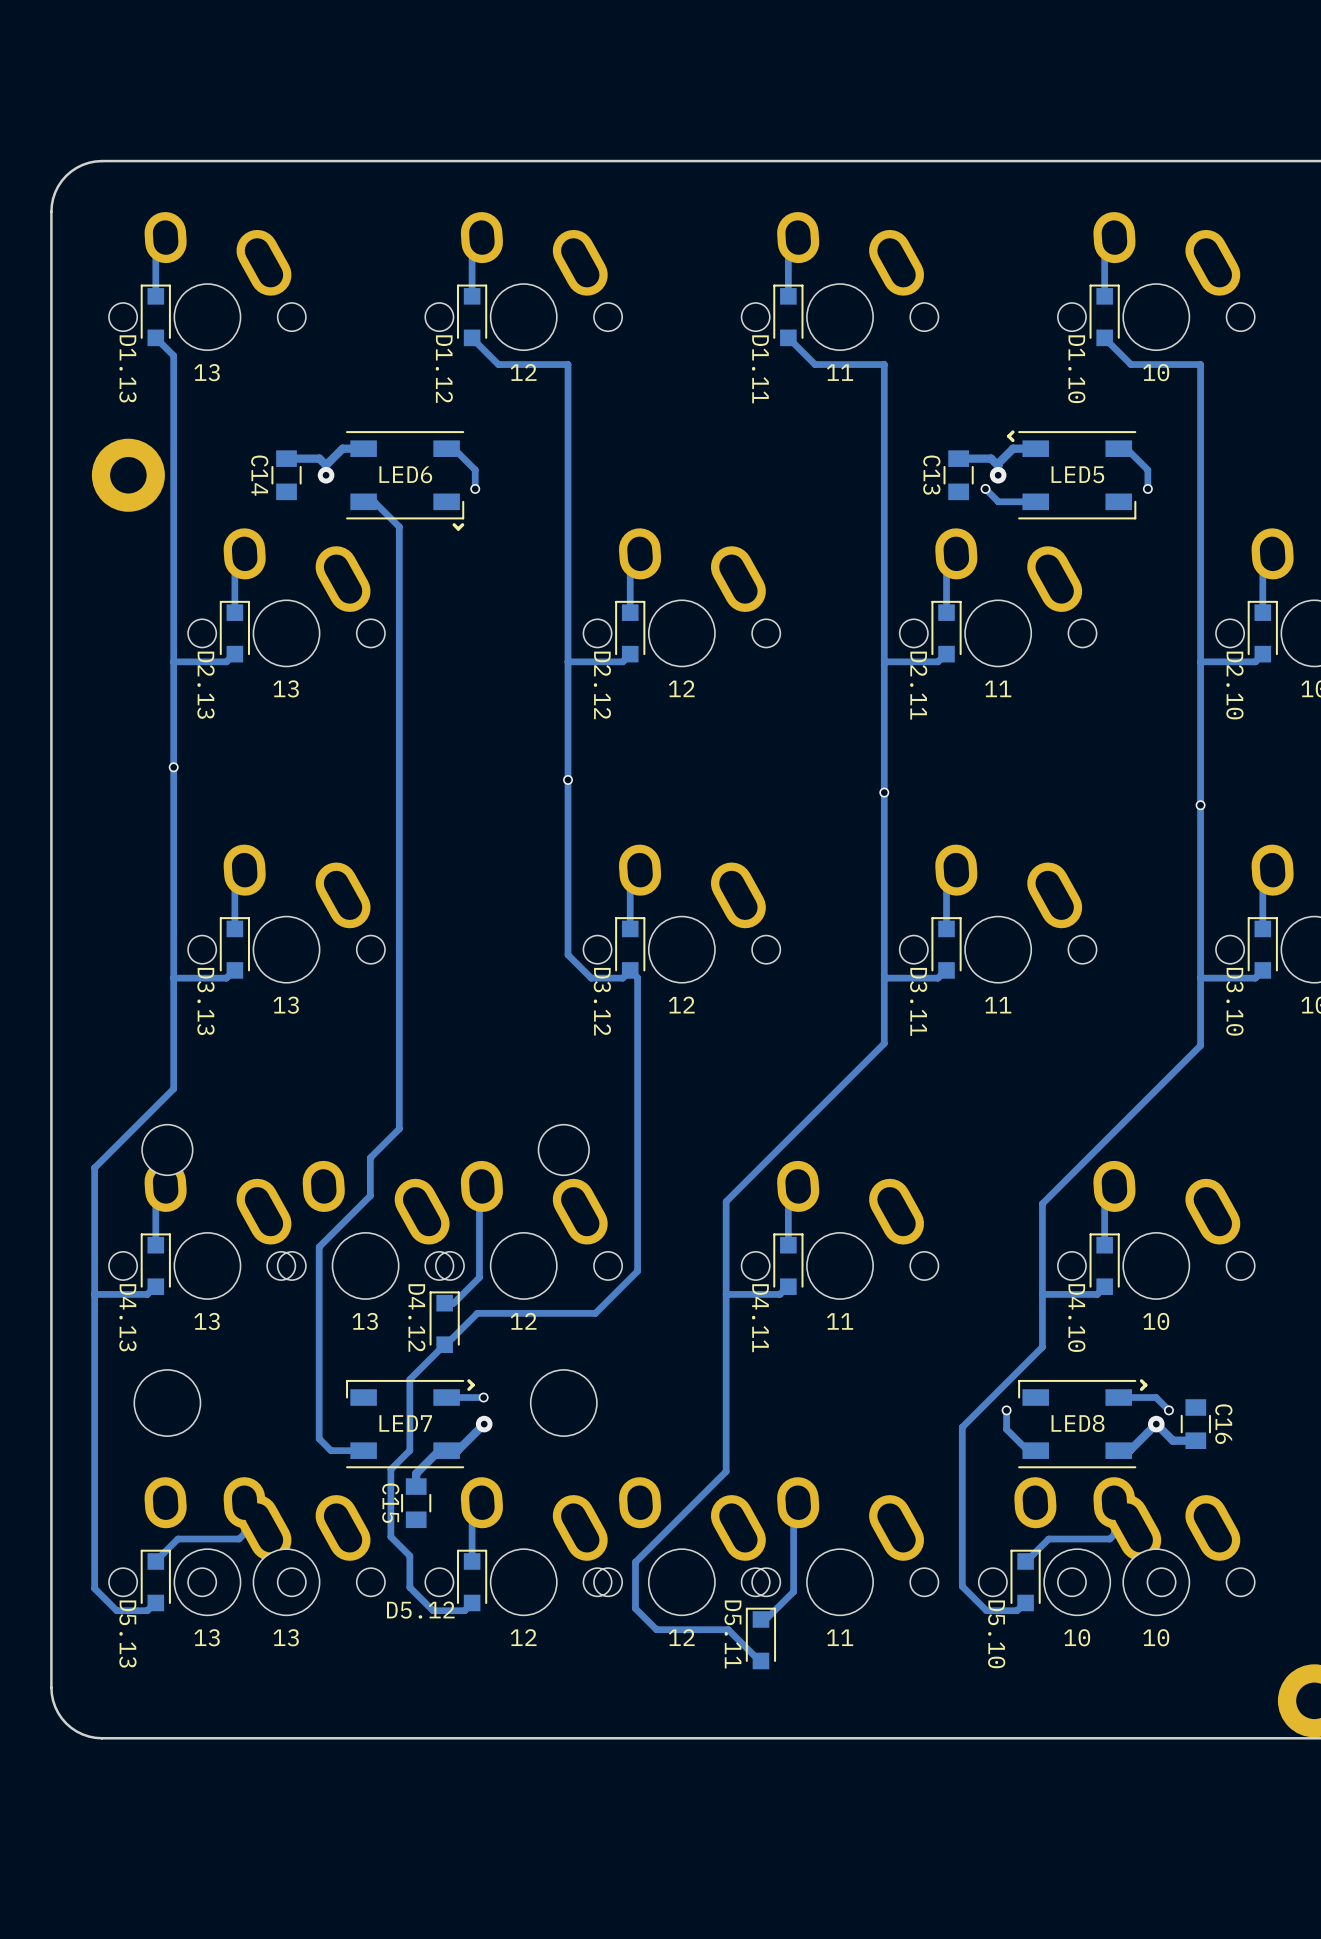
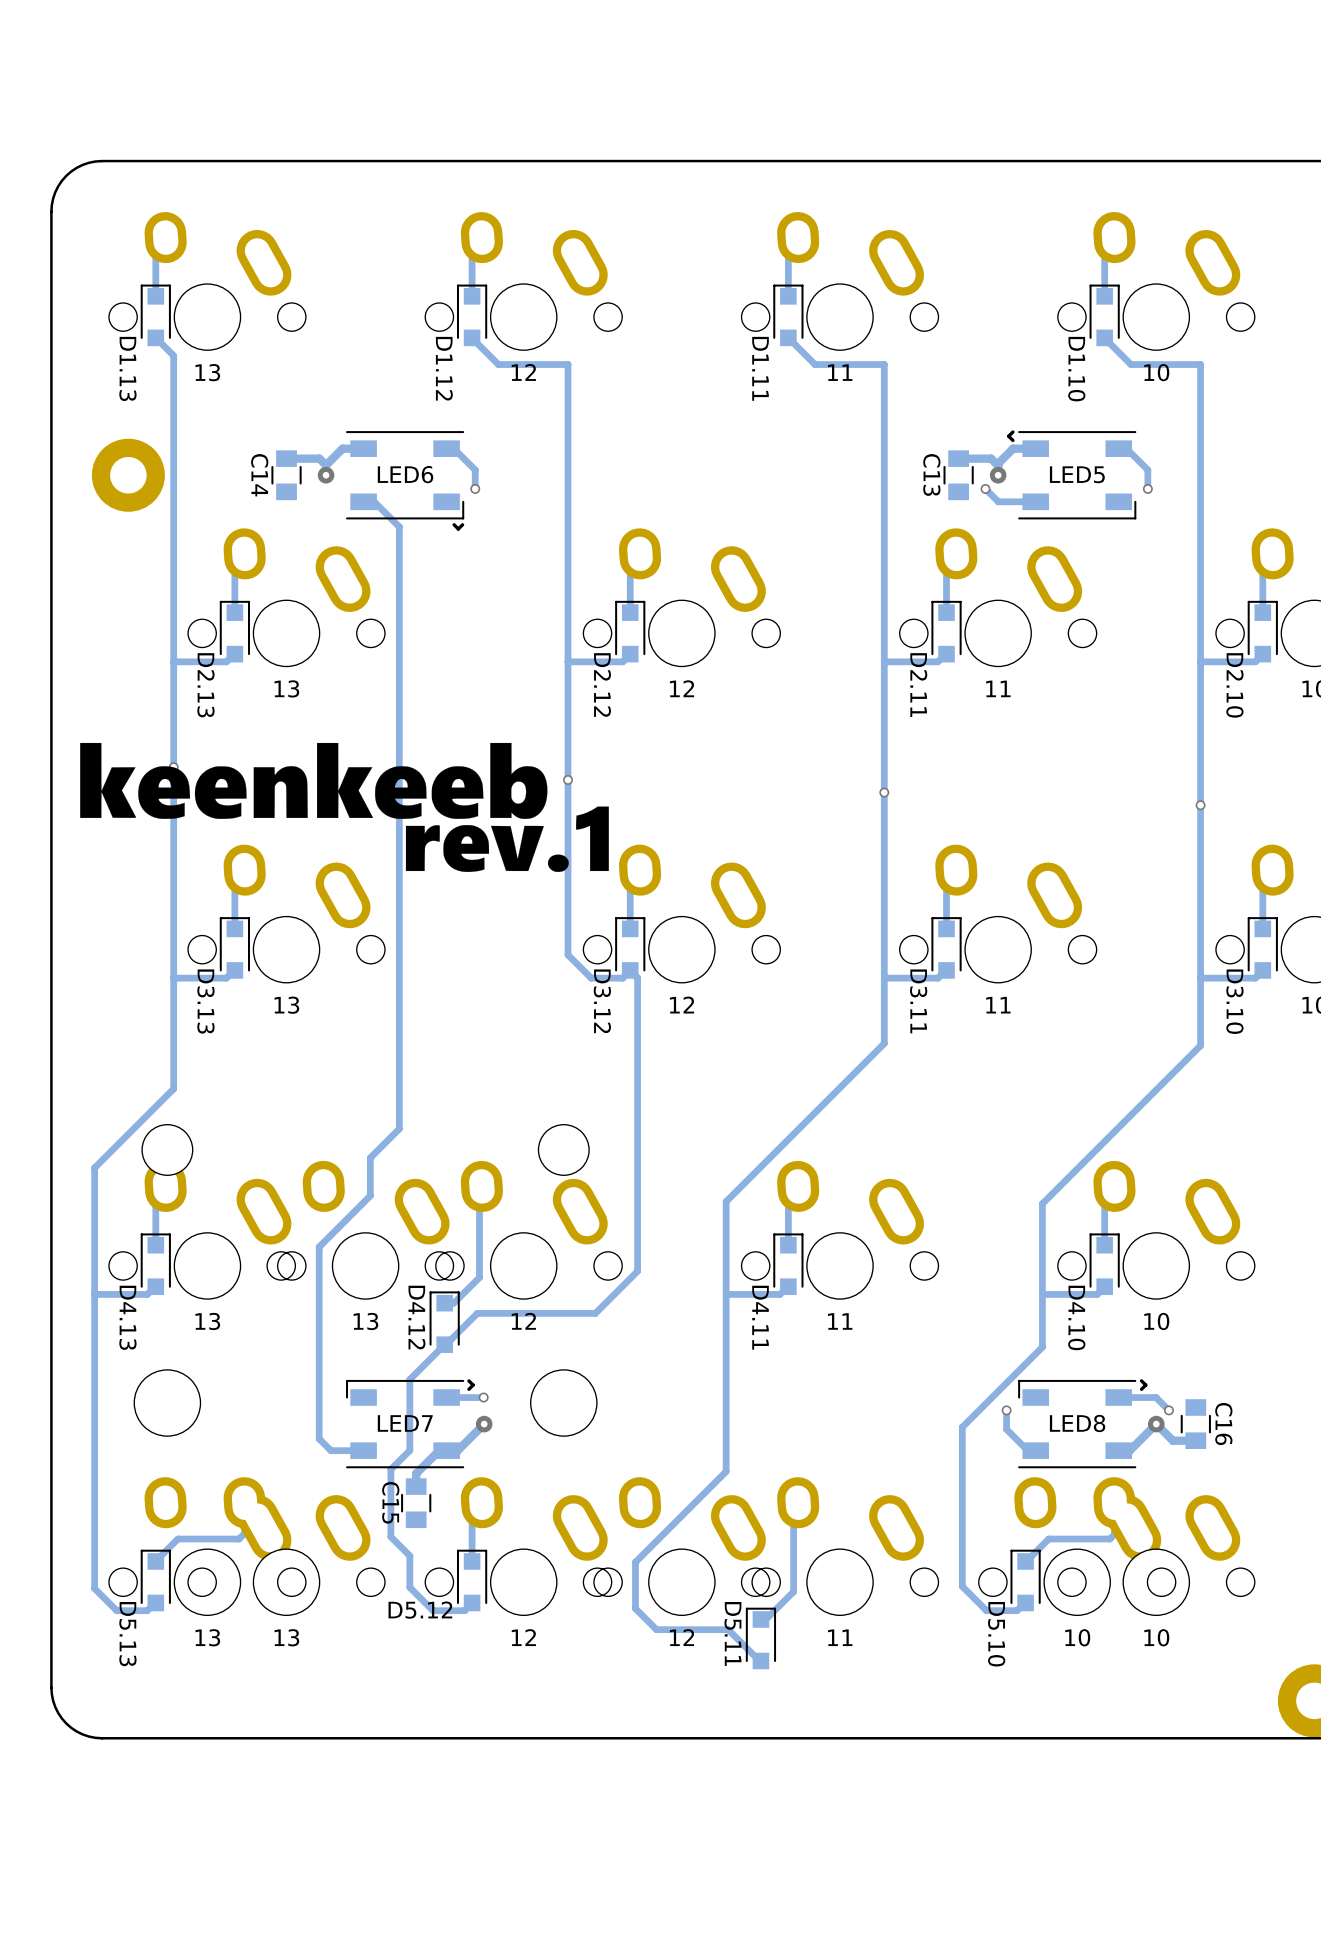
drawing: none -> [80, 742, 609, 873]

